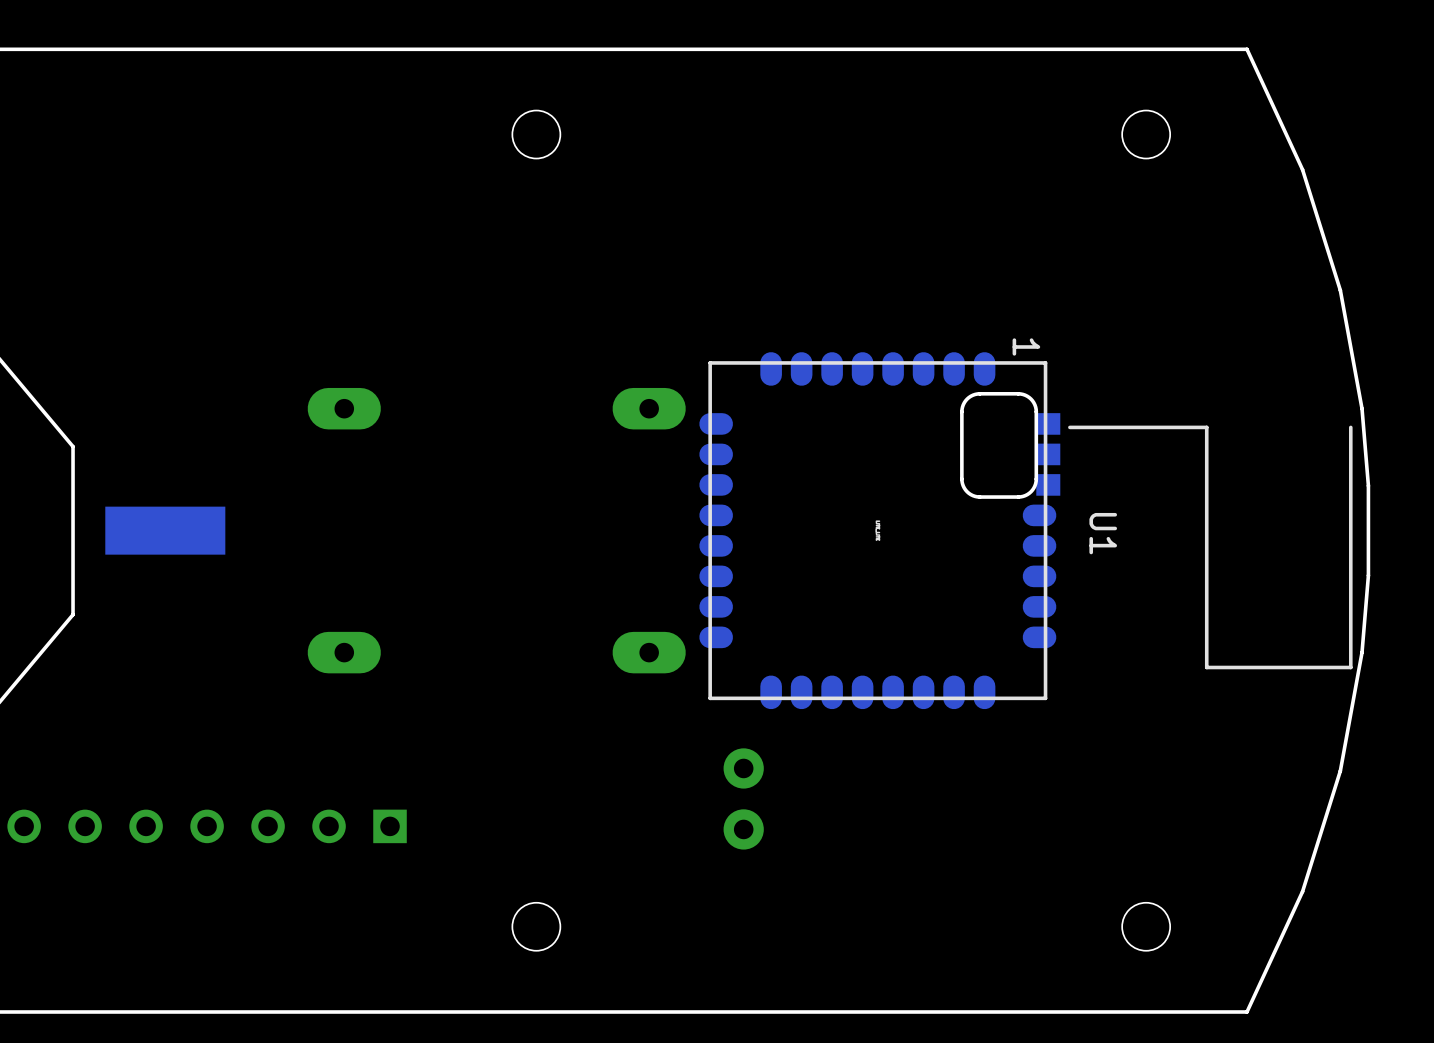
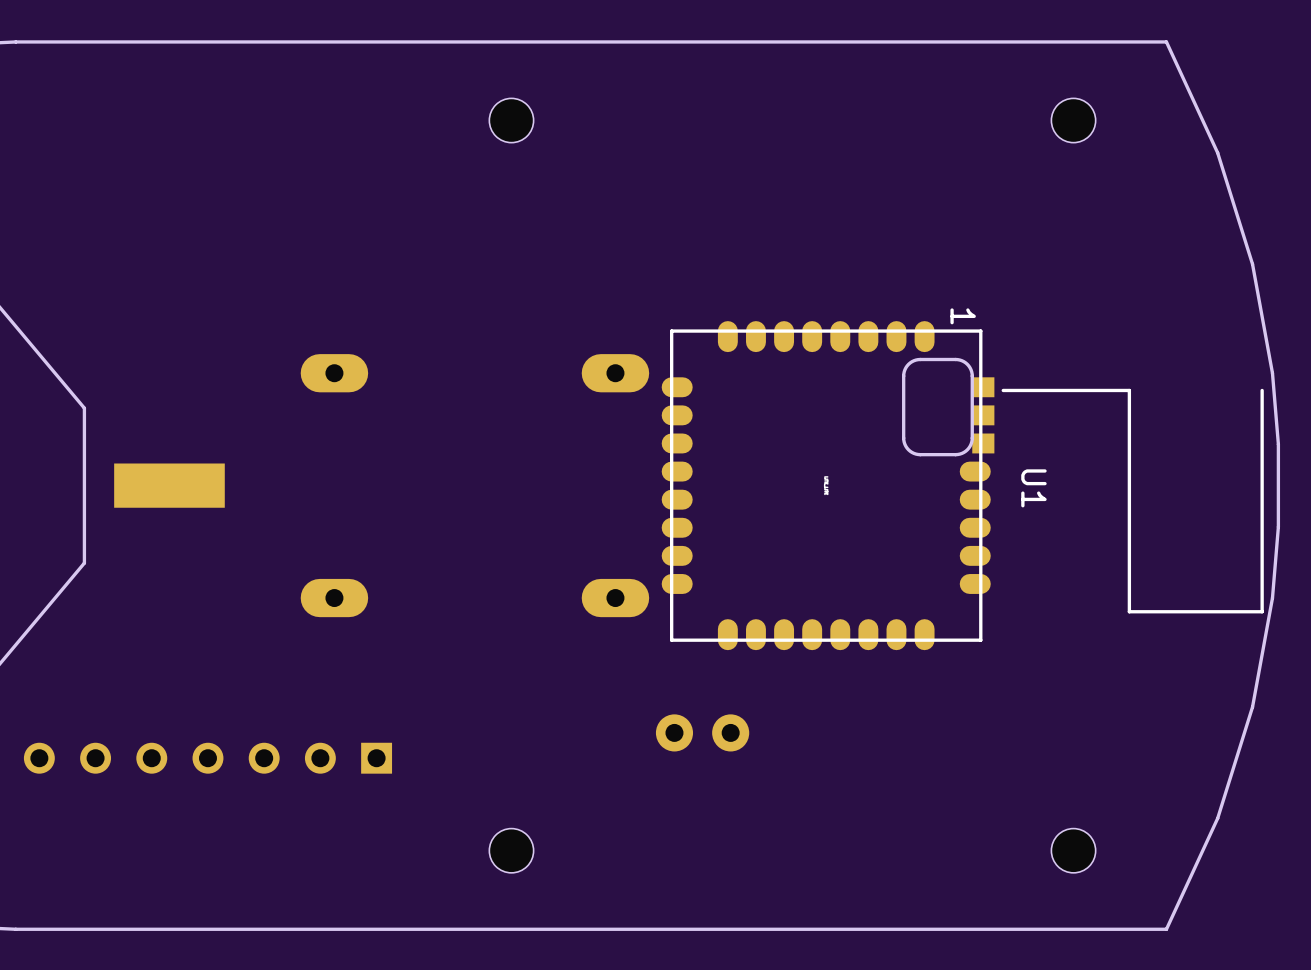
part rotation: 0° (743, 798) -> 90° clockwise (702, 732)

